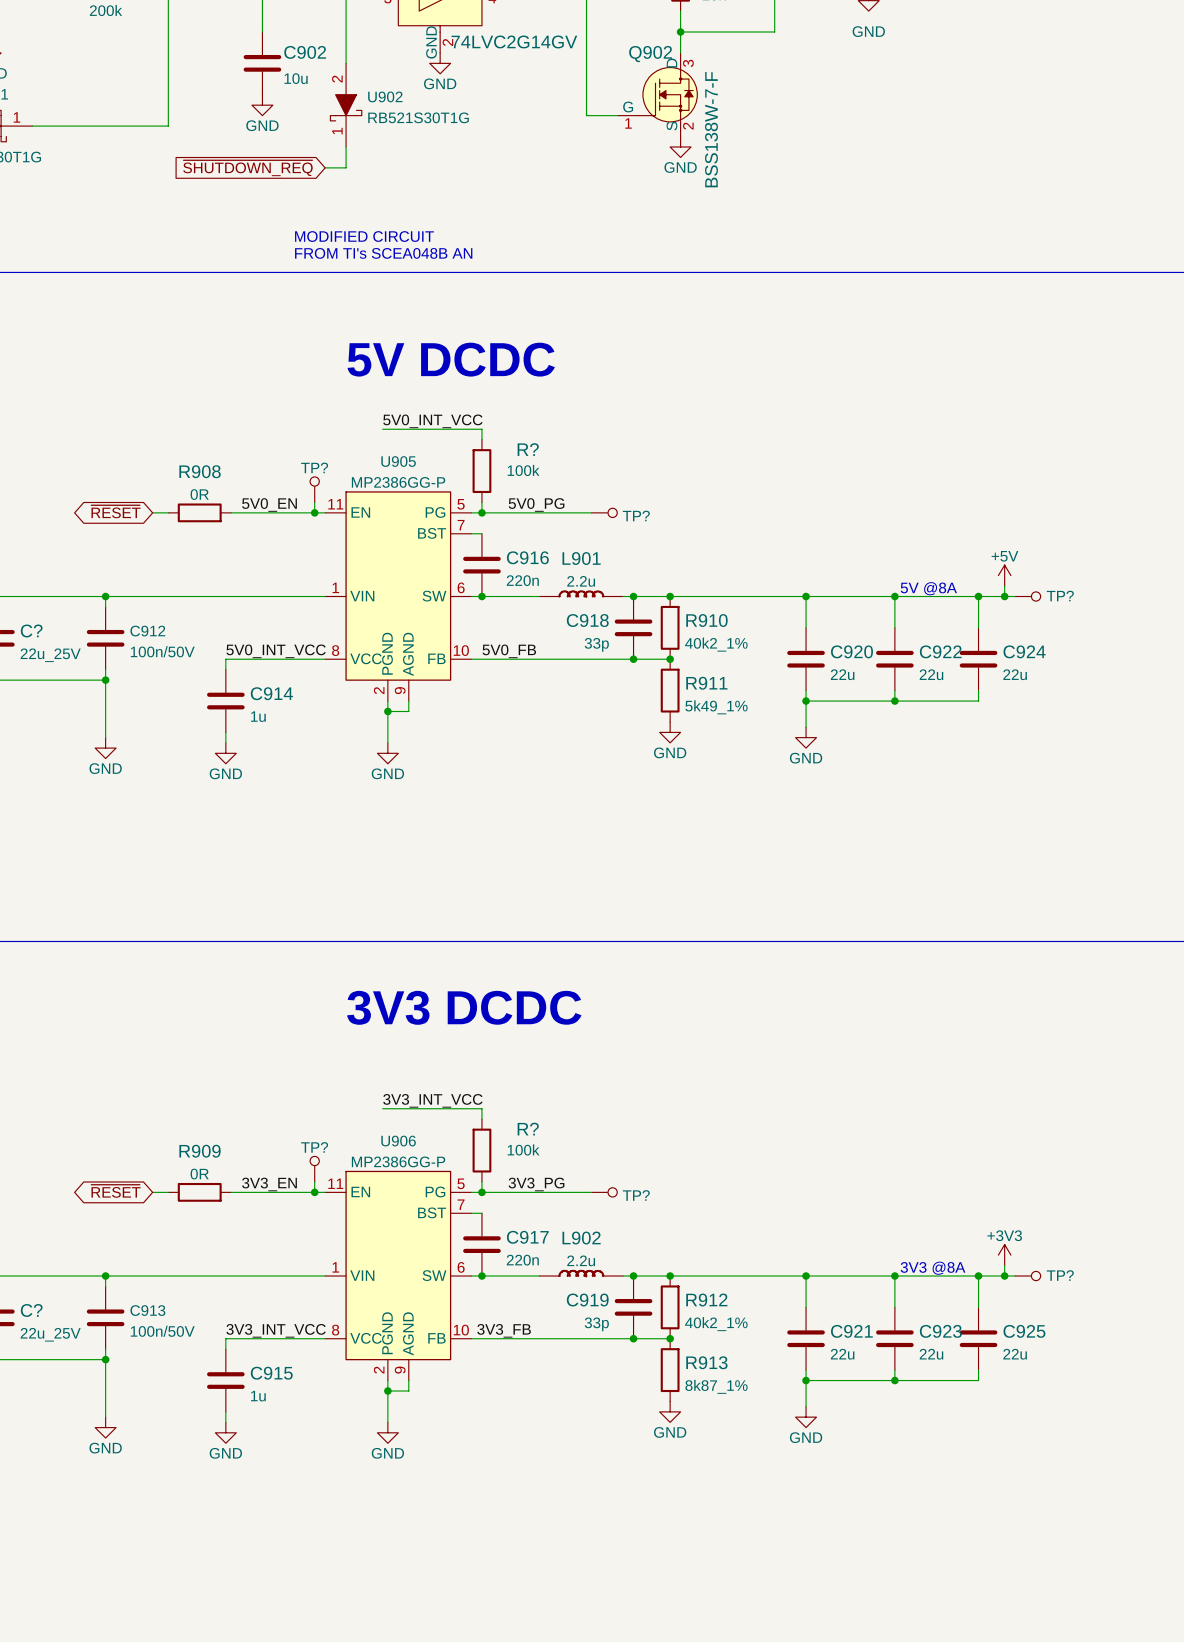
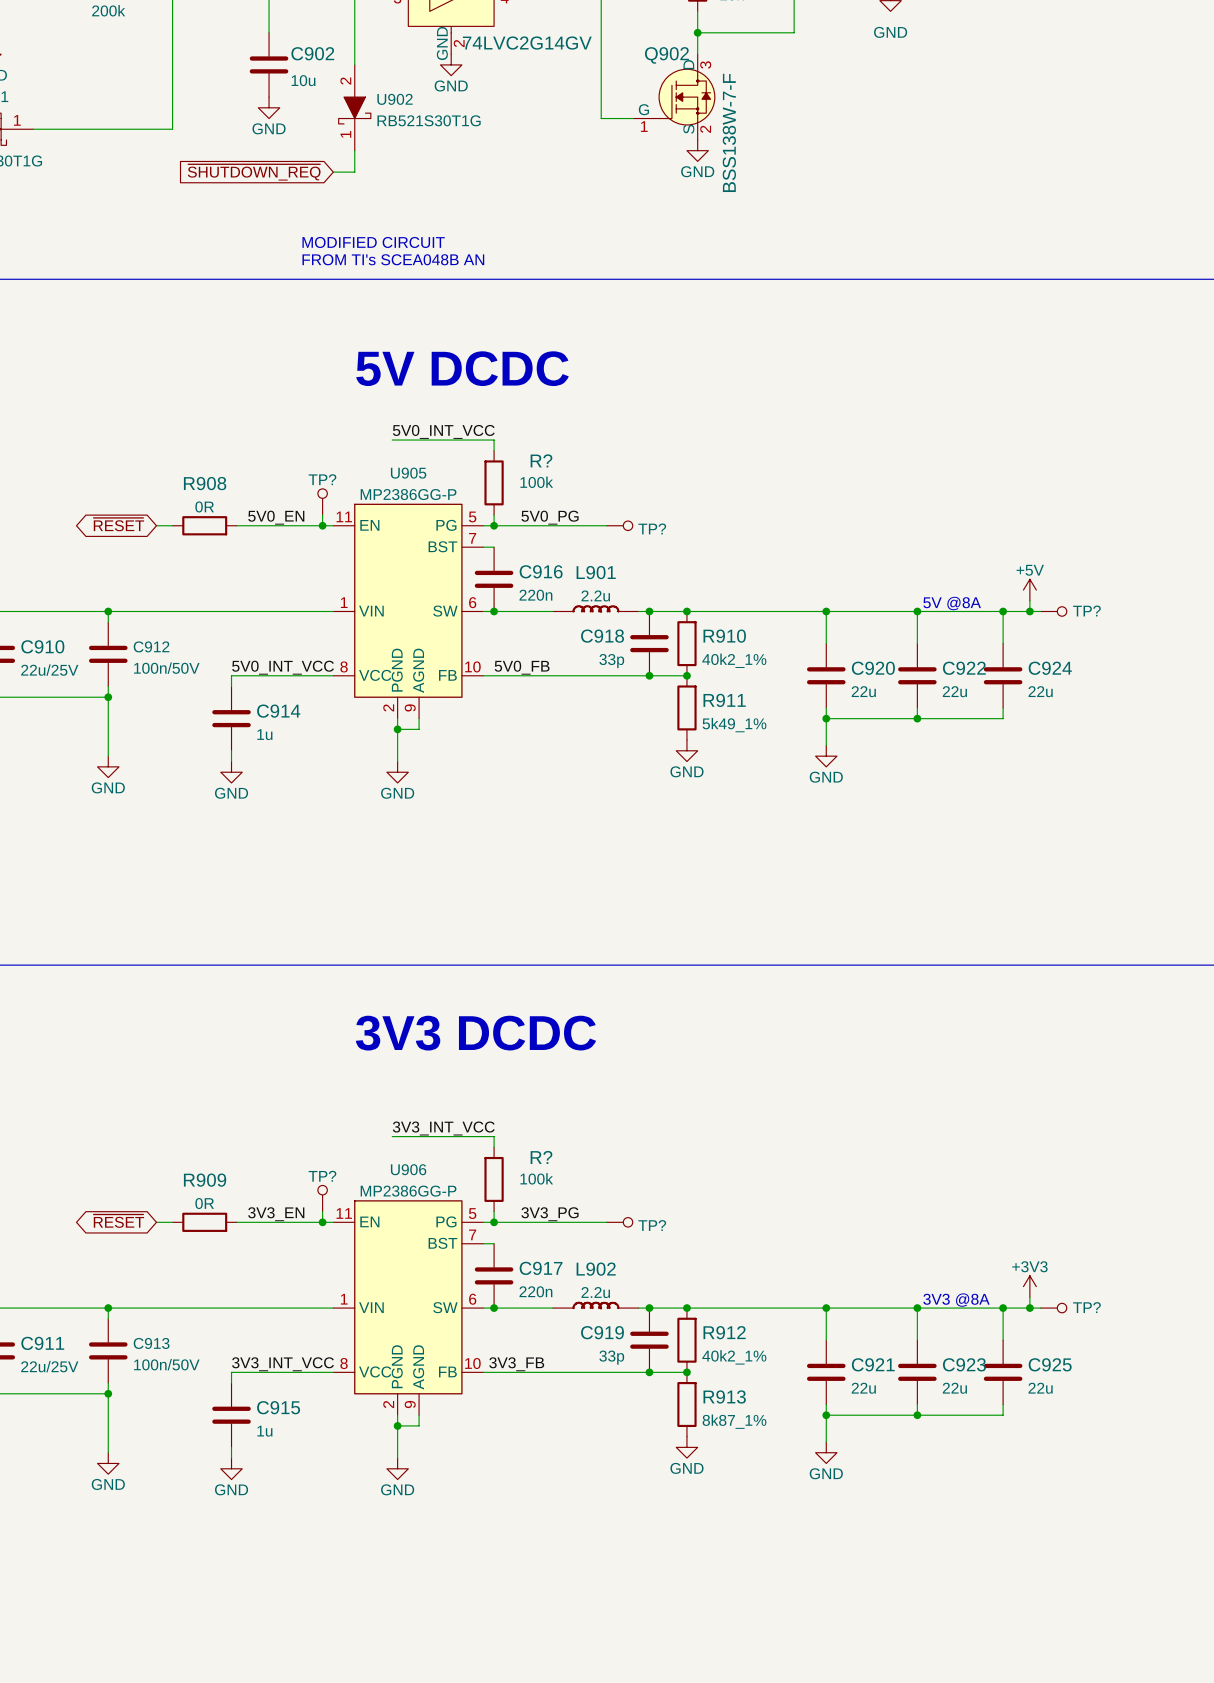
C? name: C? (31, 630) -> C910 (42, 646)
C? text: 22u_25V (50, 655) -> 22u/25V (49, 670)
C? name: C? (31, 1310) -> C911 (42, 1343)
C? text: 22u_25V (50, 1334) -> 22u/25V (49, 1366)

